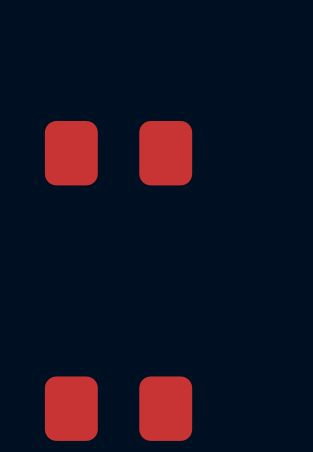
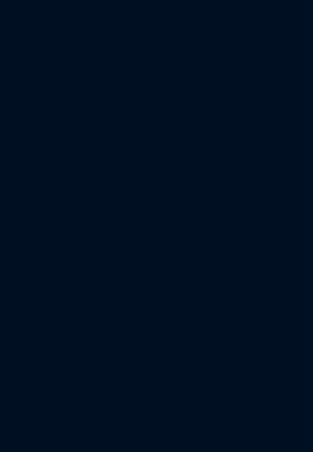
part: (118, 153) -> none
part: (118, 408) -> none

